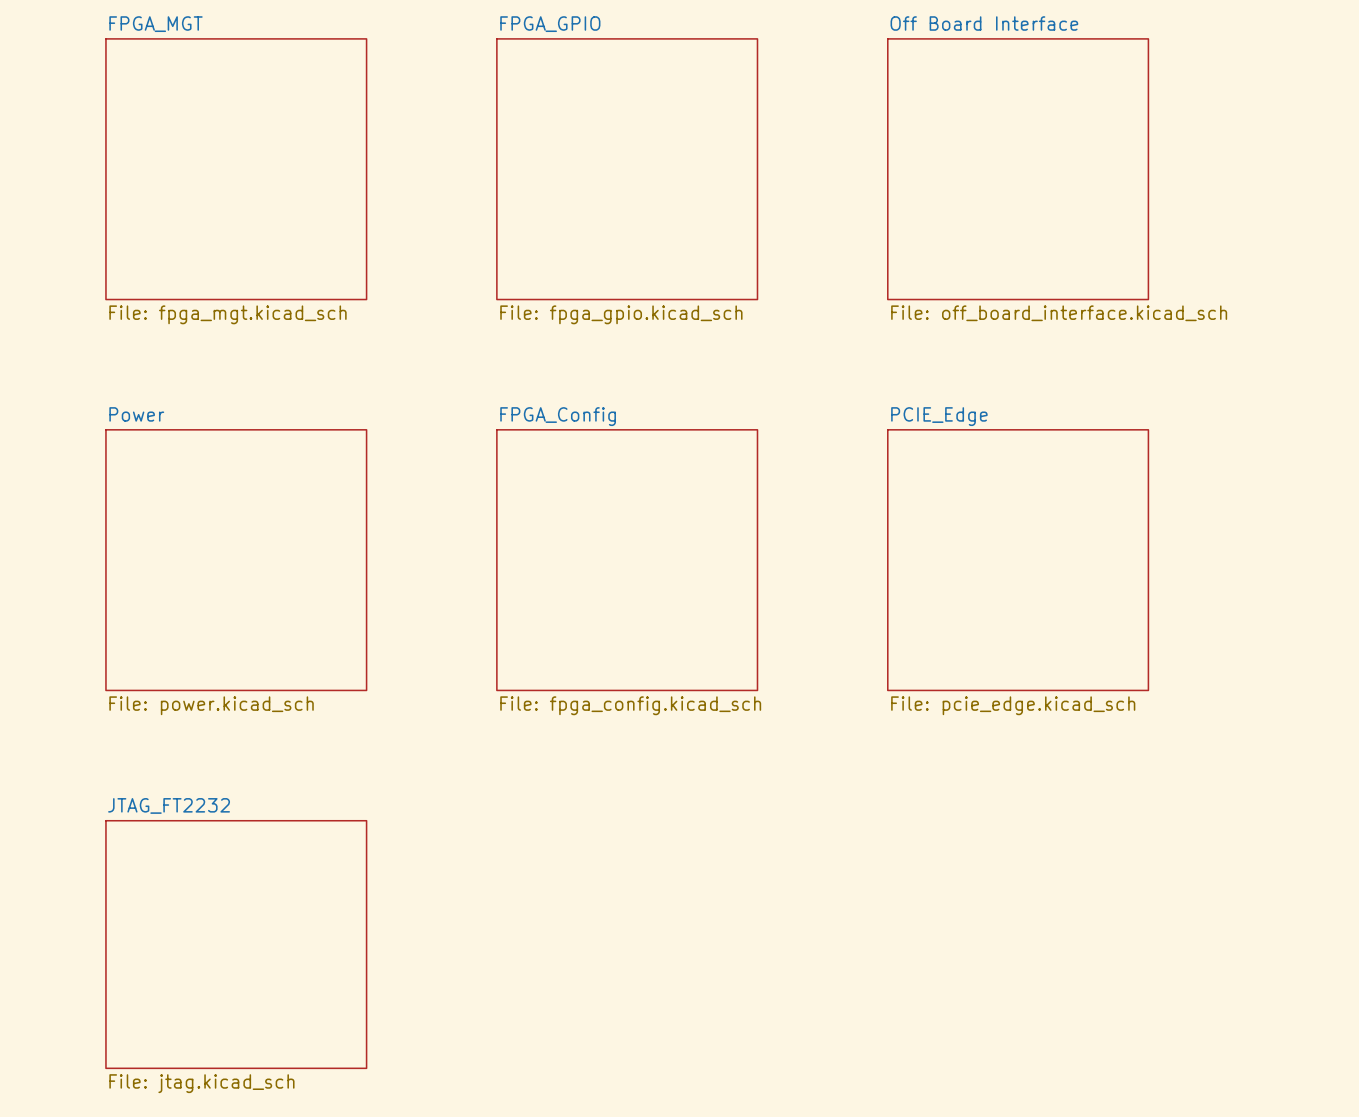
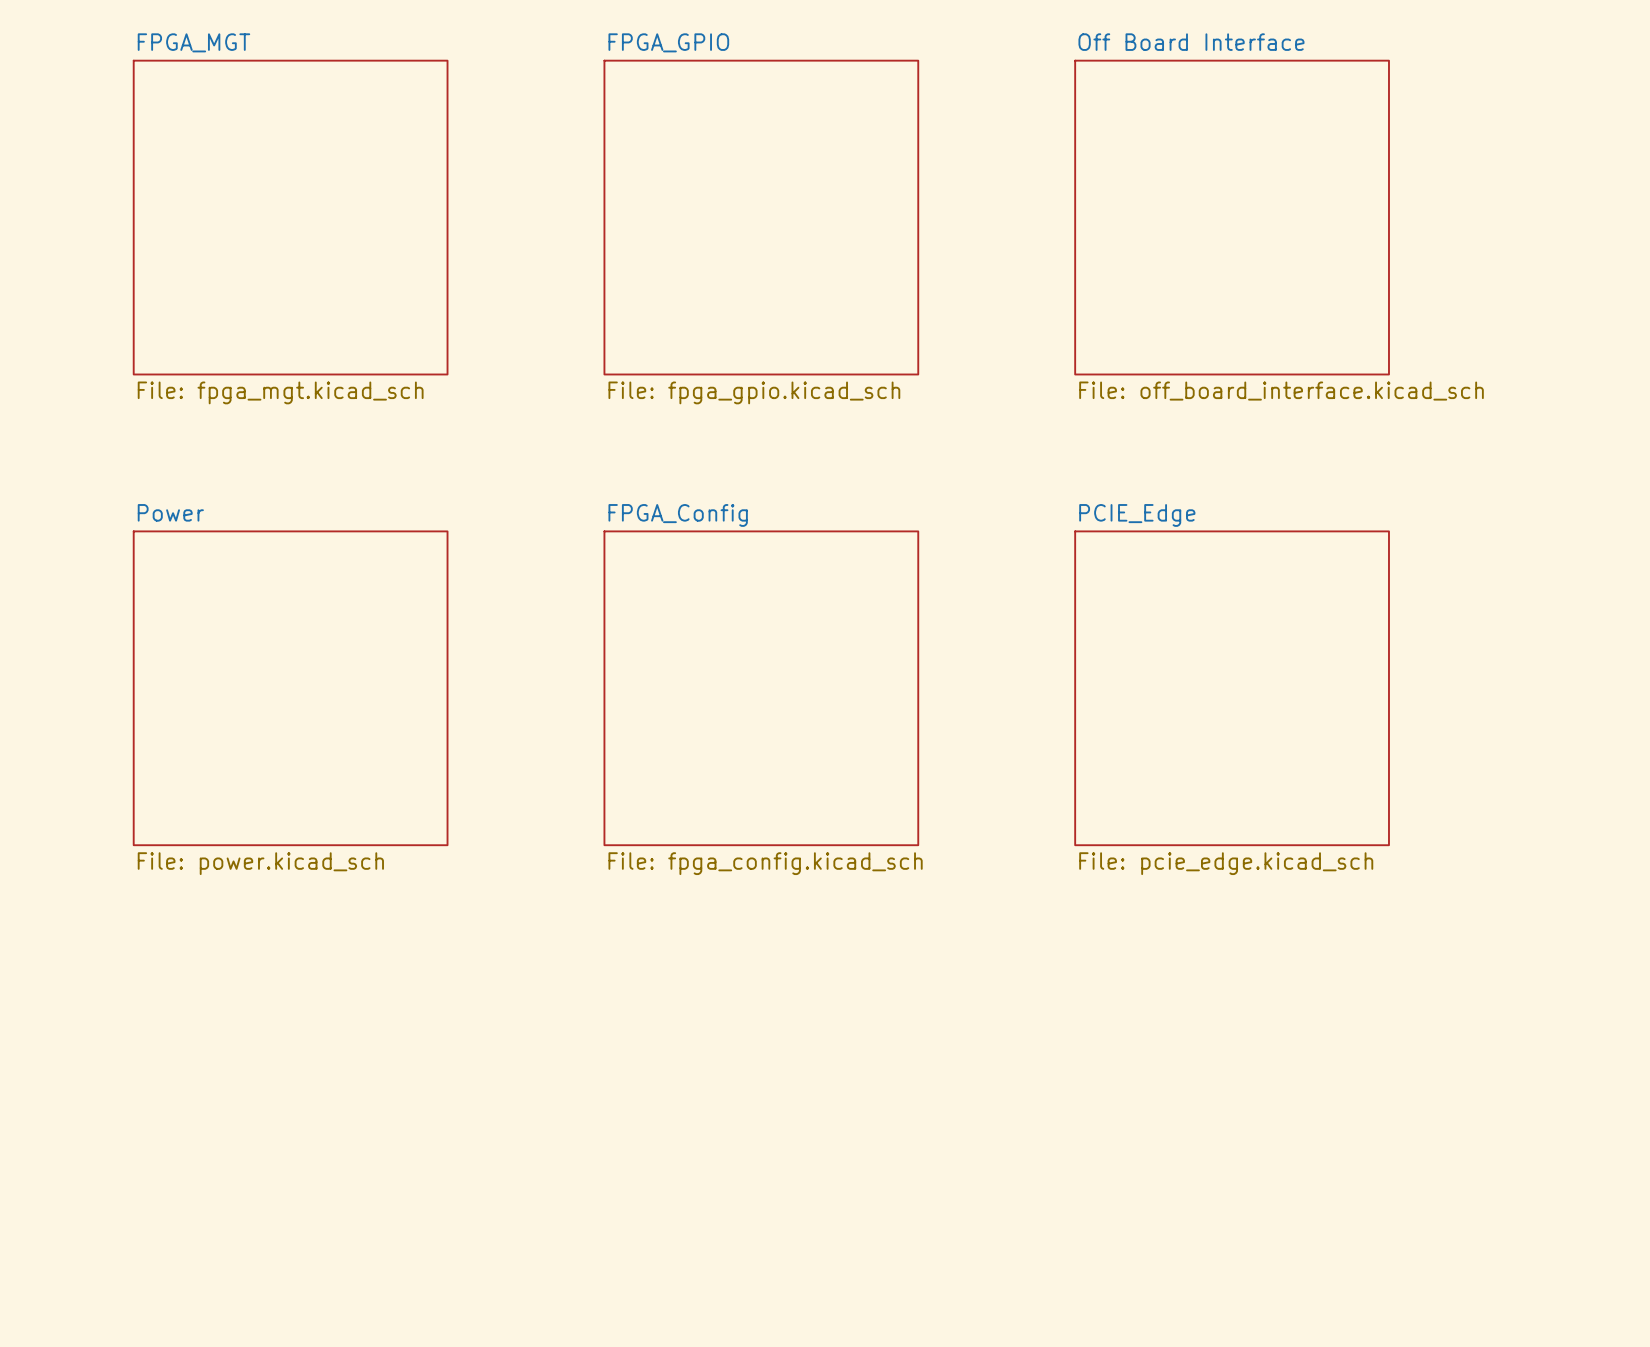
sheet JTAG_FT2232: File: jtag.kicad_sch (236, 944) -> none

